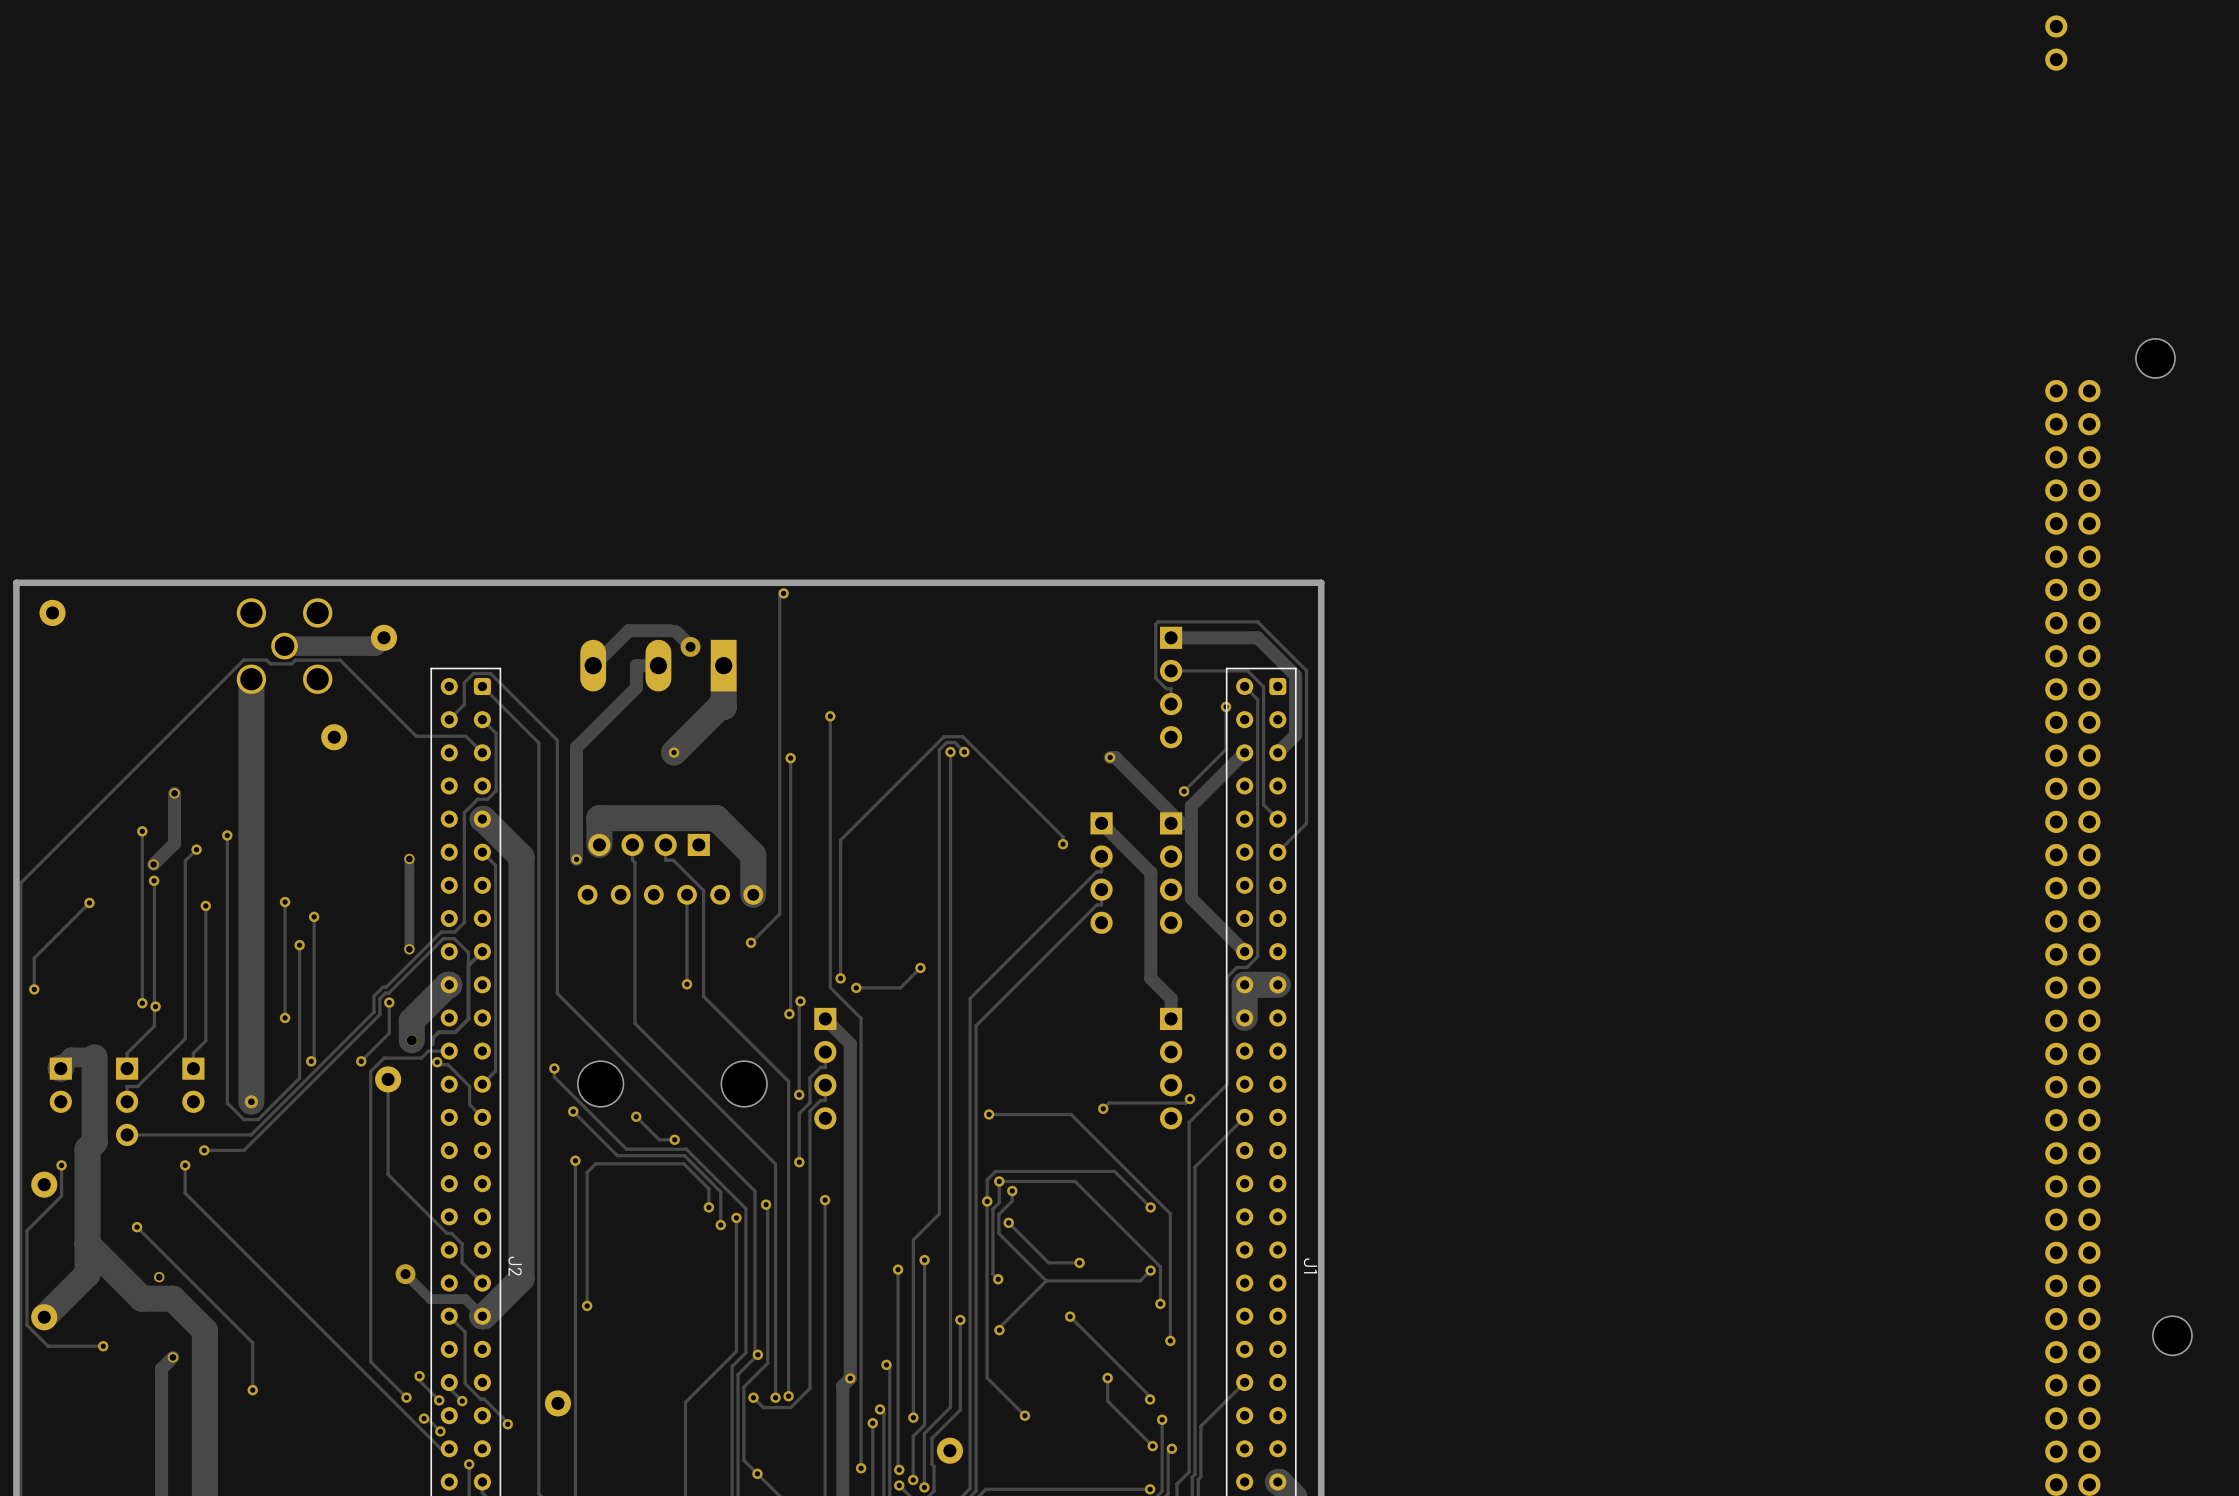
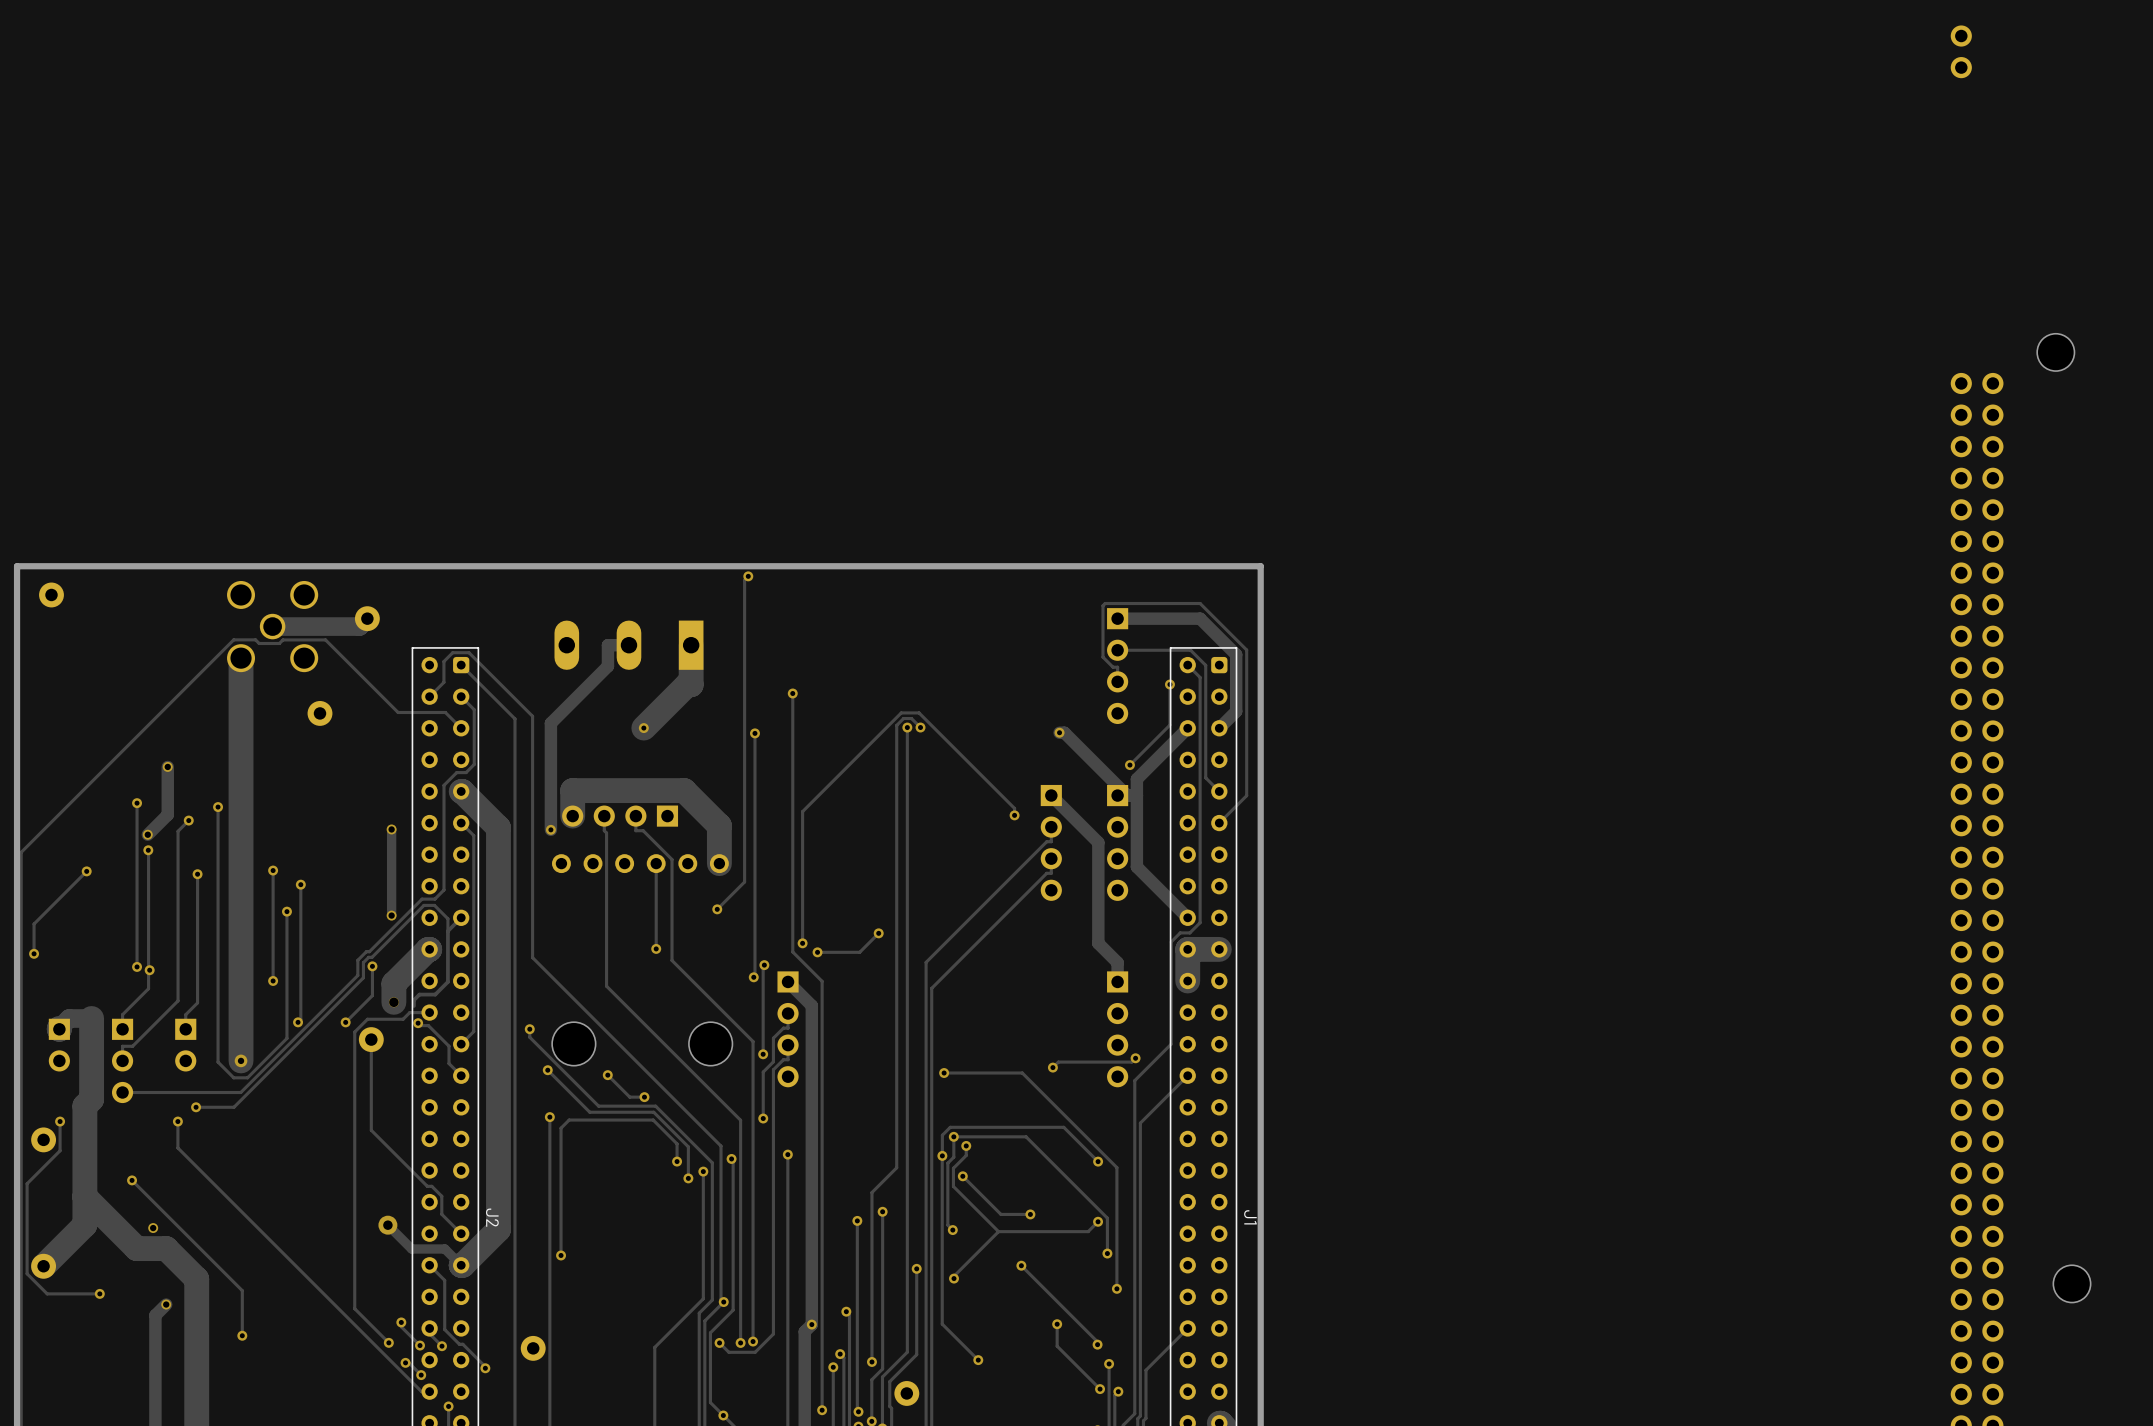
track: (670, 630) (628, 630) (592, 666) -> none
track: (675, 631) (687, 642) -> none
via: (690, 646) -> none

